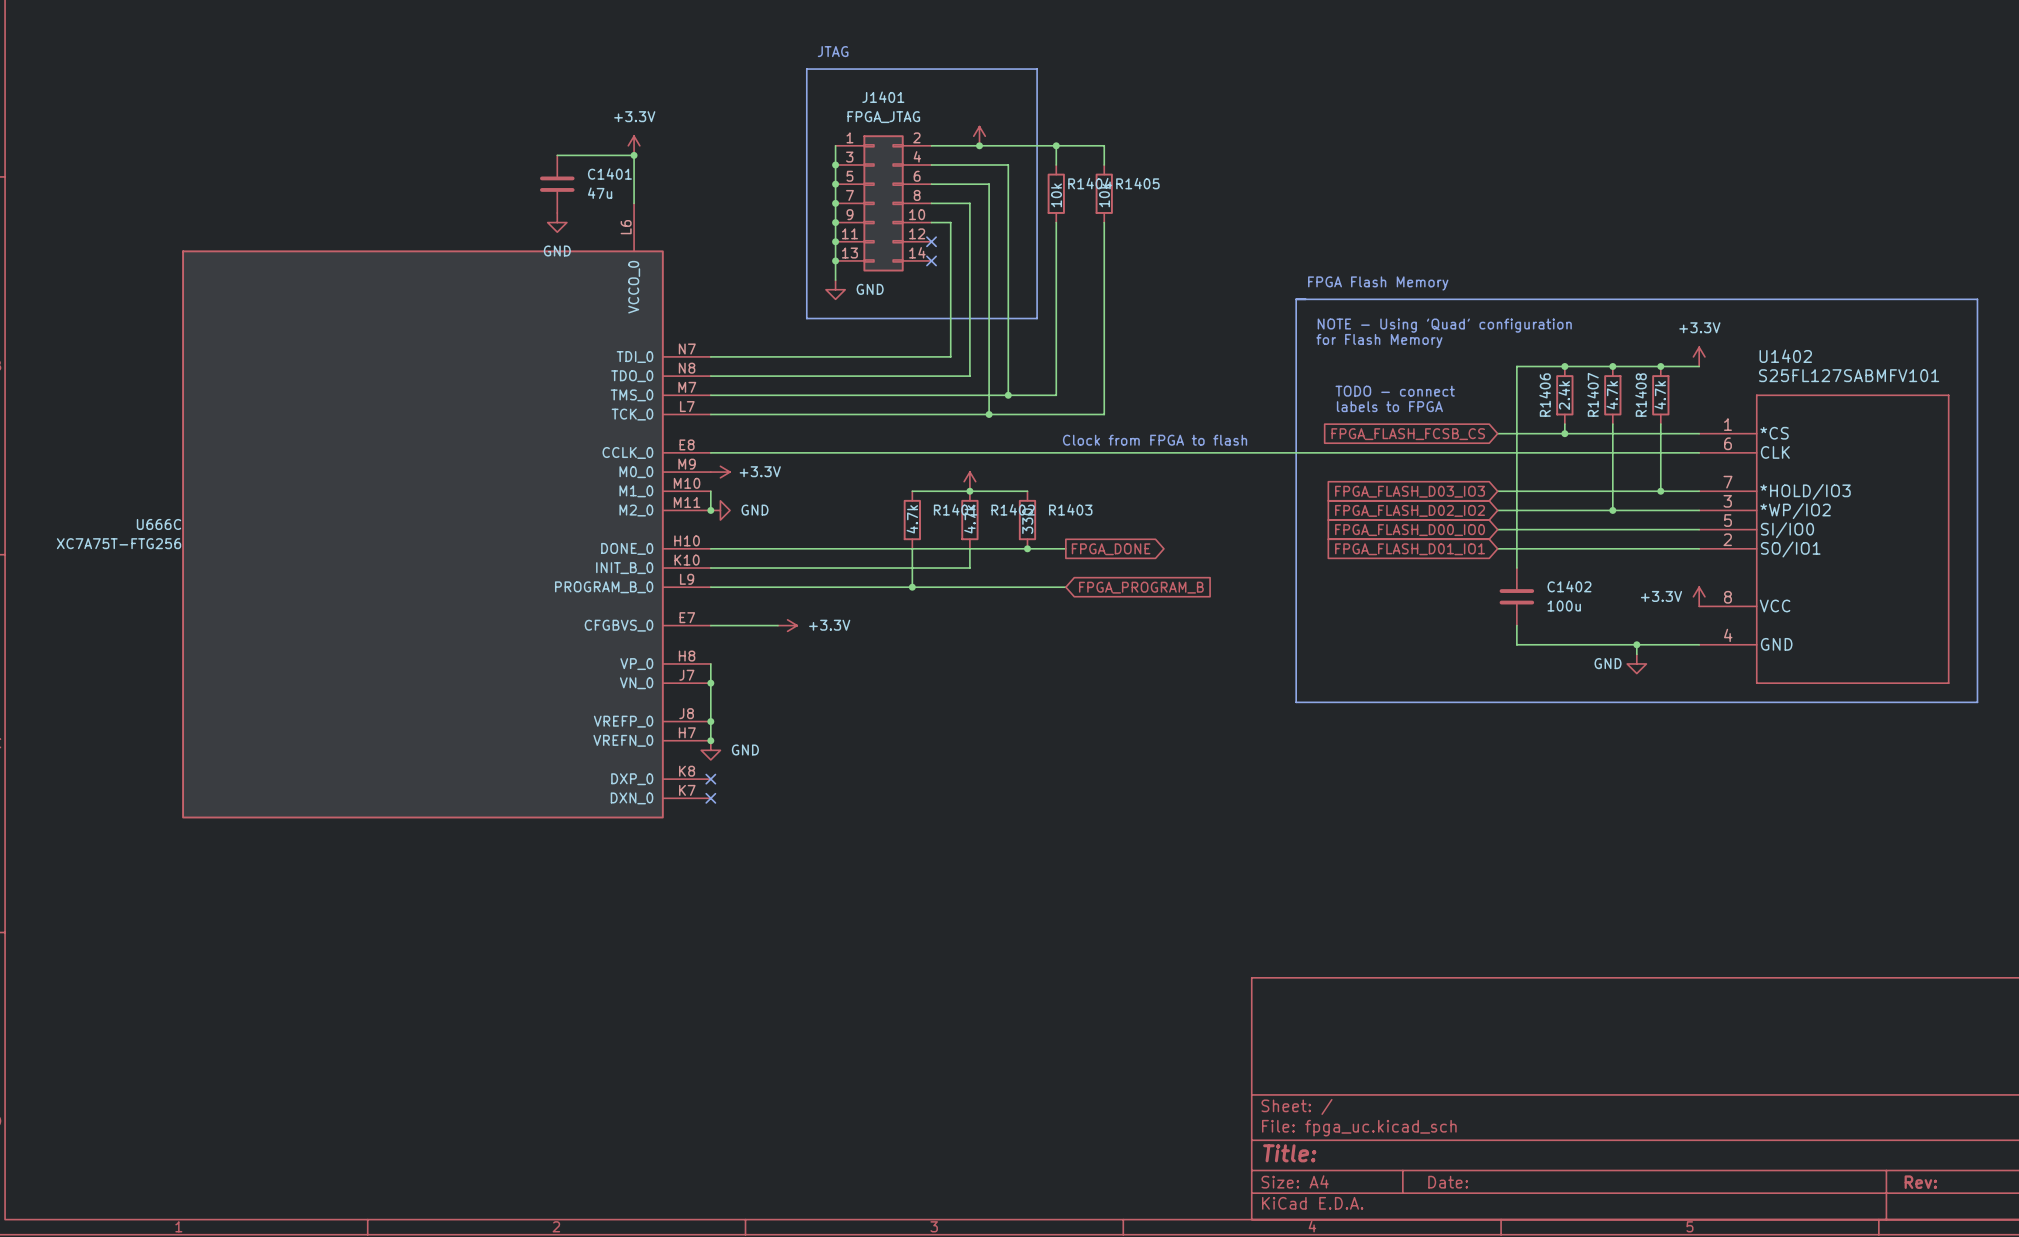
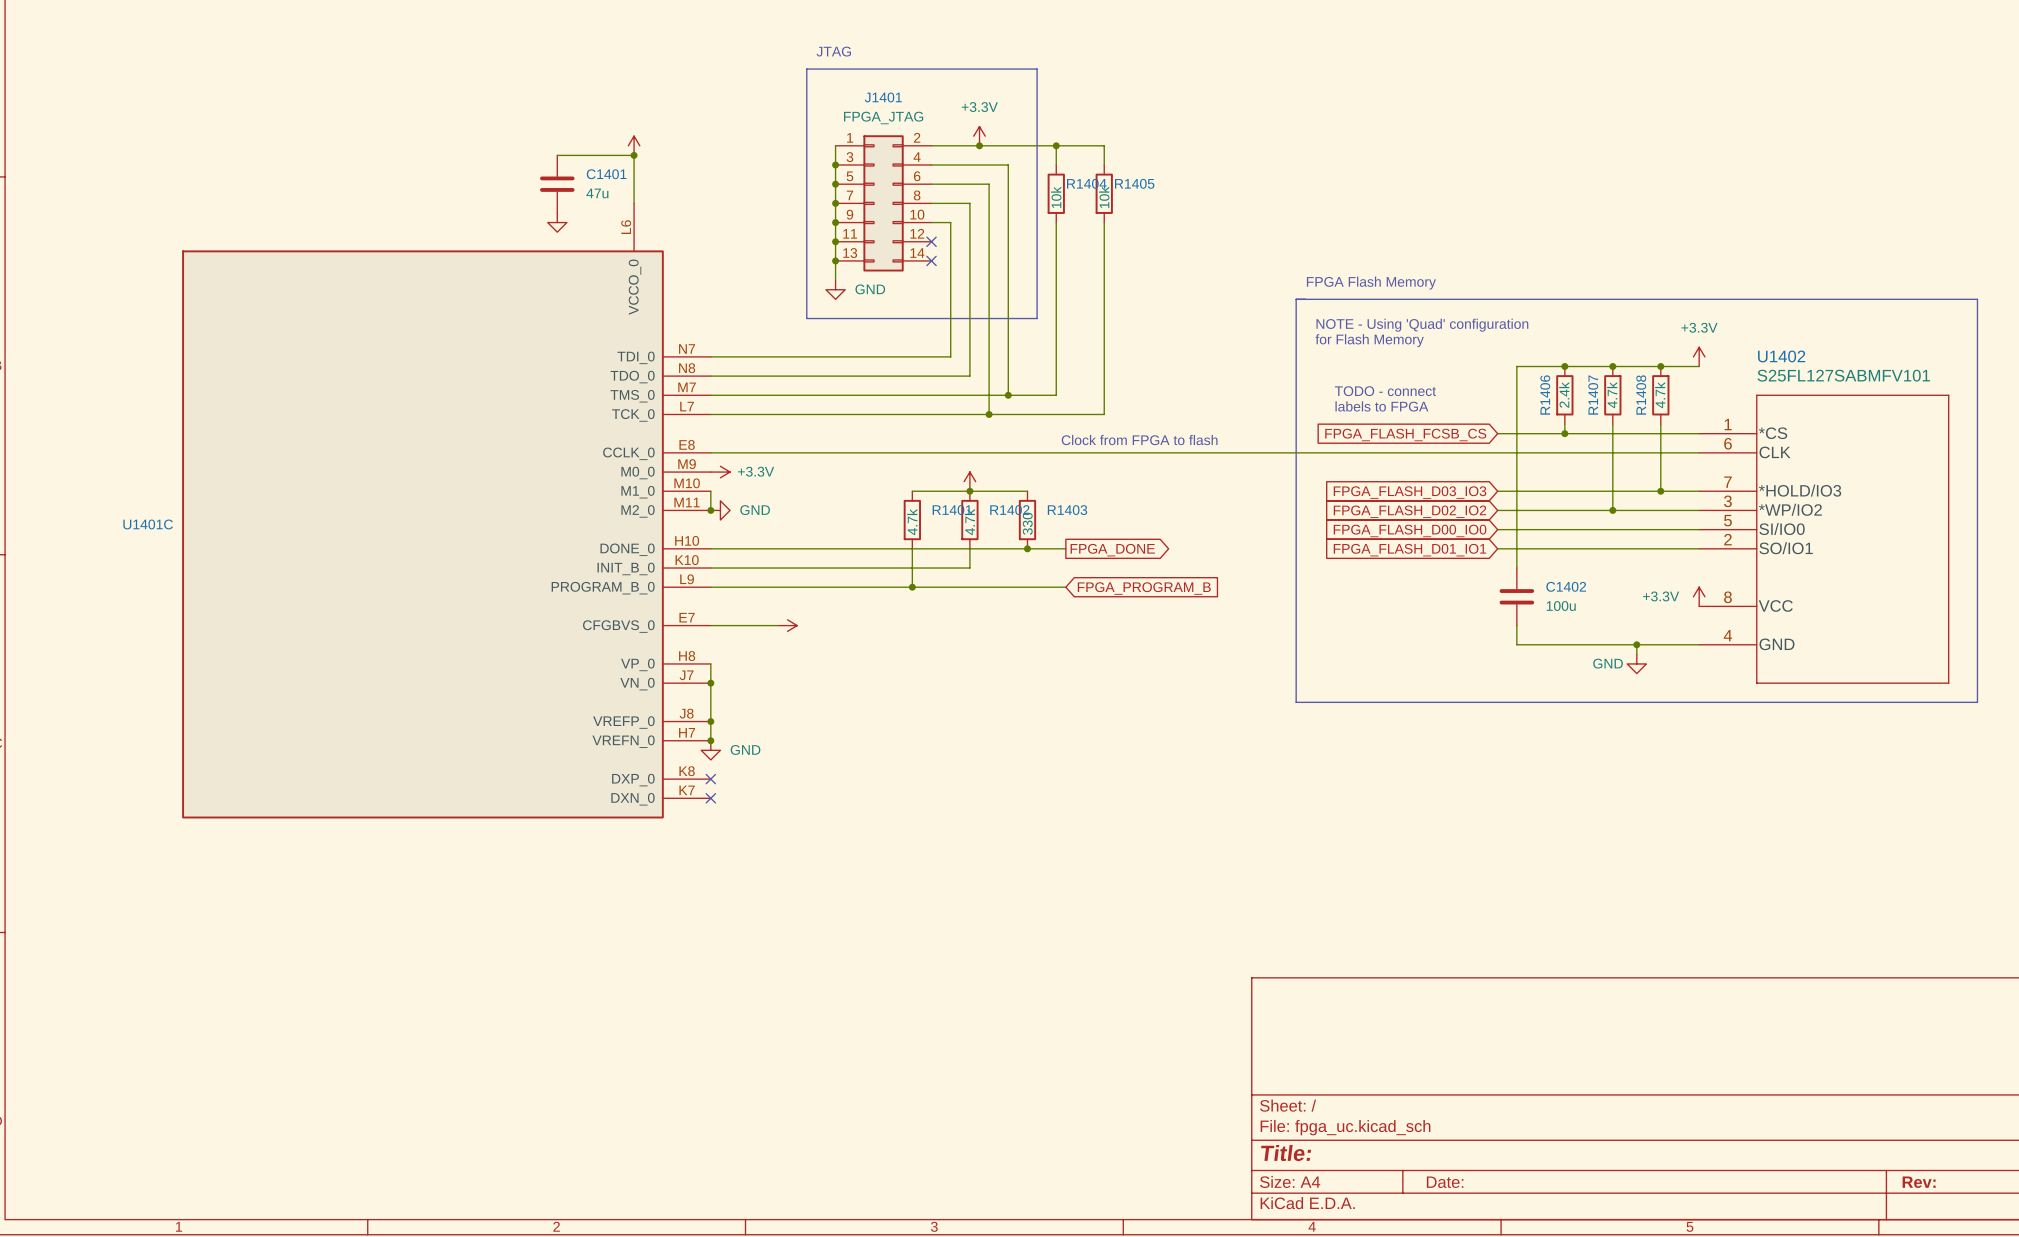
power symbol text: none -> +3.3V (979, 107)
power symbol text: +3.3V (634, 116) -> none
power symbol text: GND (557, 251) -> none
U666C name: U666C (159, 524) -> U1401C (148, 524)
U666C value: XC7A75T-FTG256 (119, 543) -> none
power symbol text: +3.3V (829, 625) -> none

